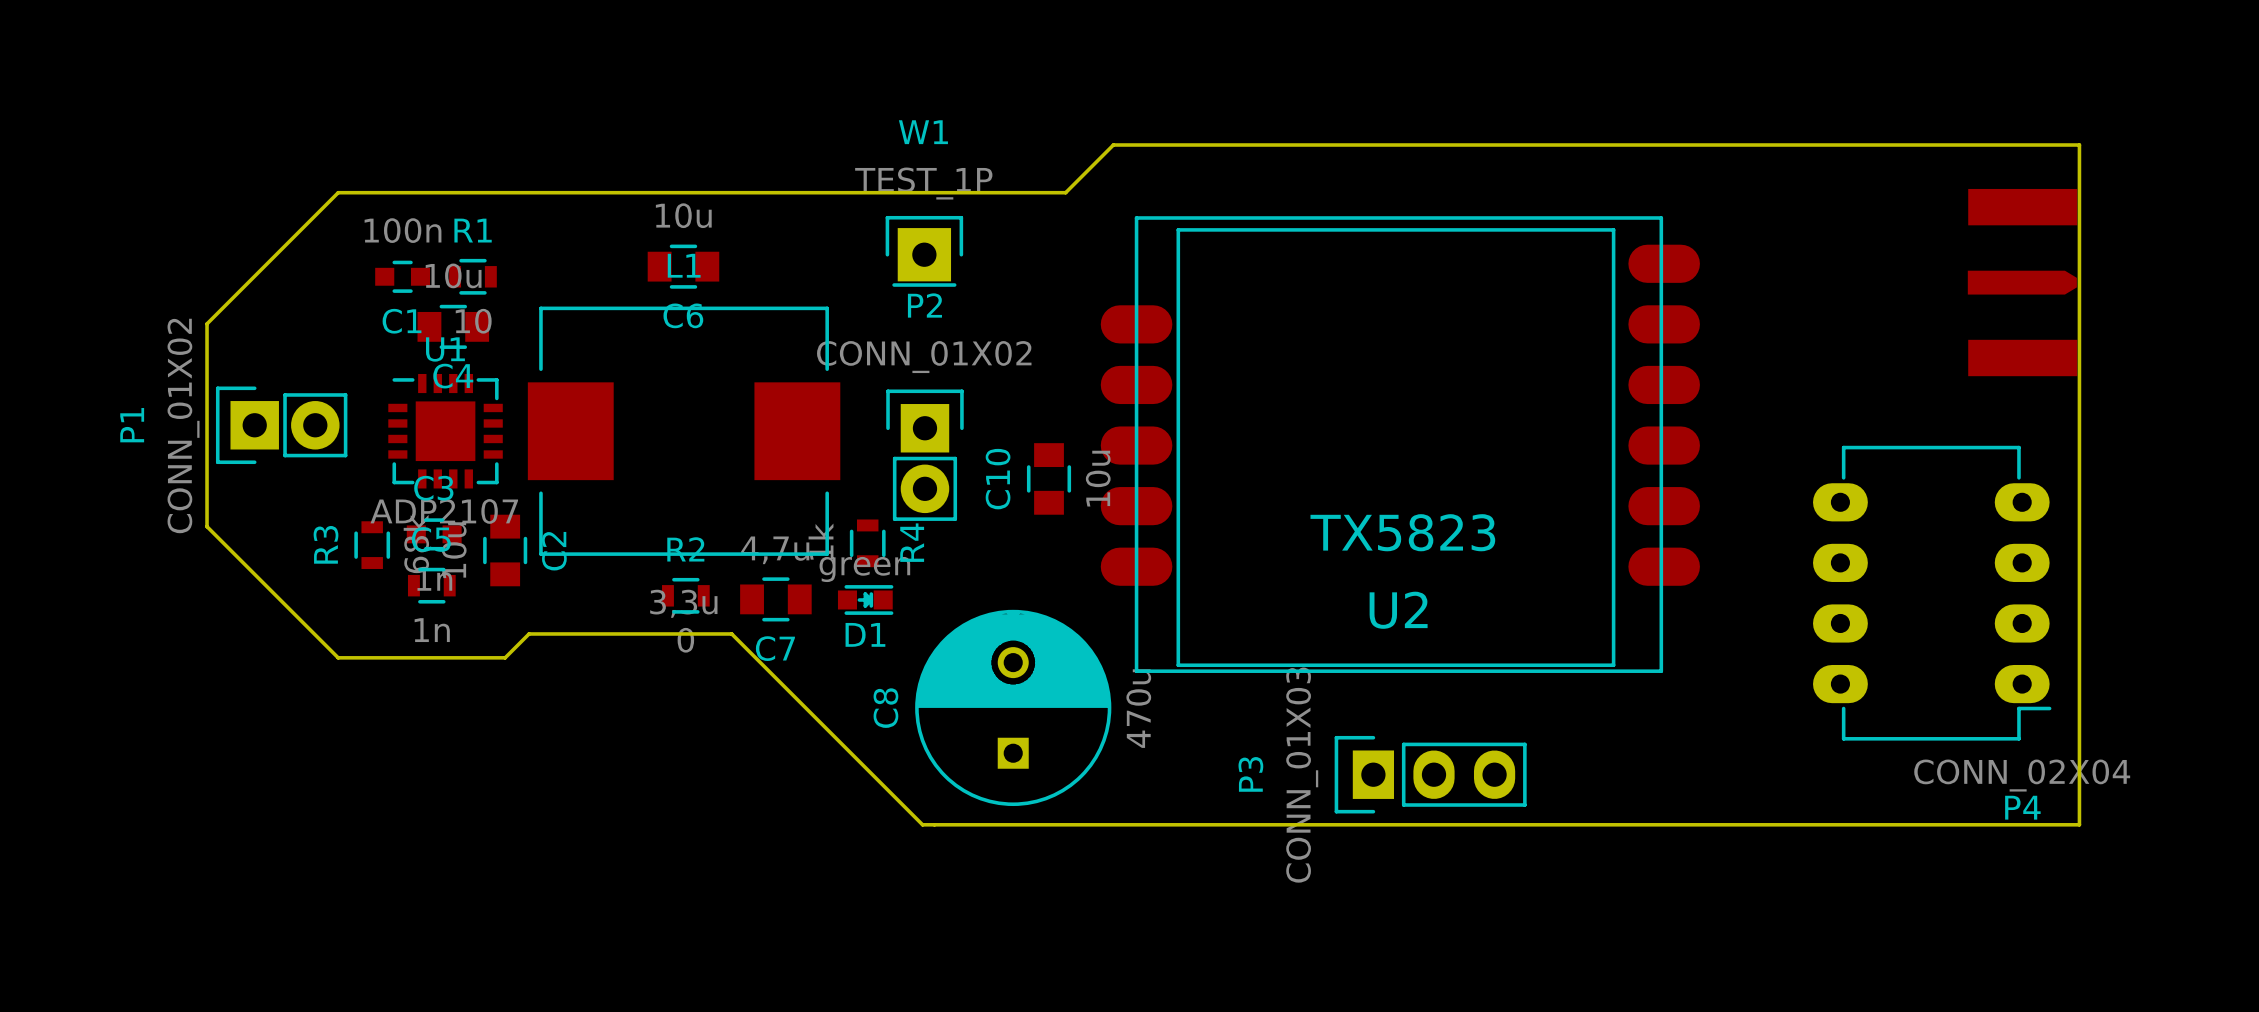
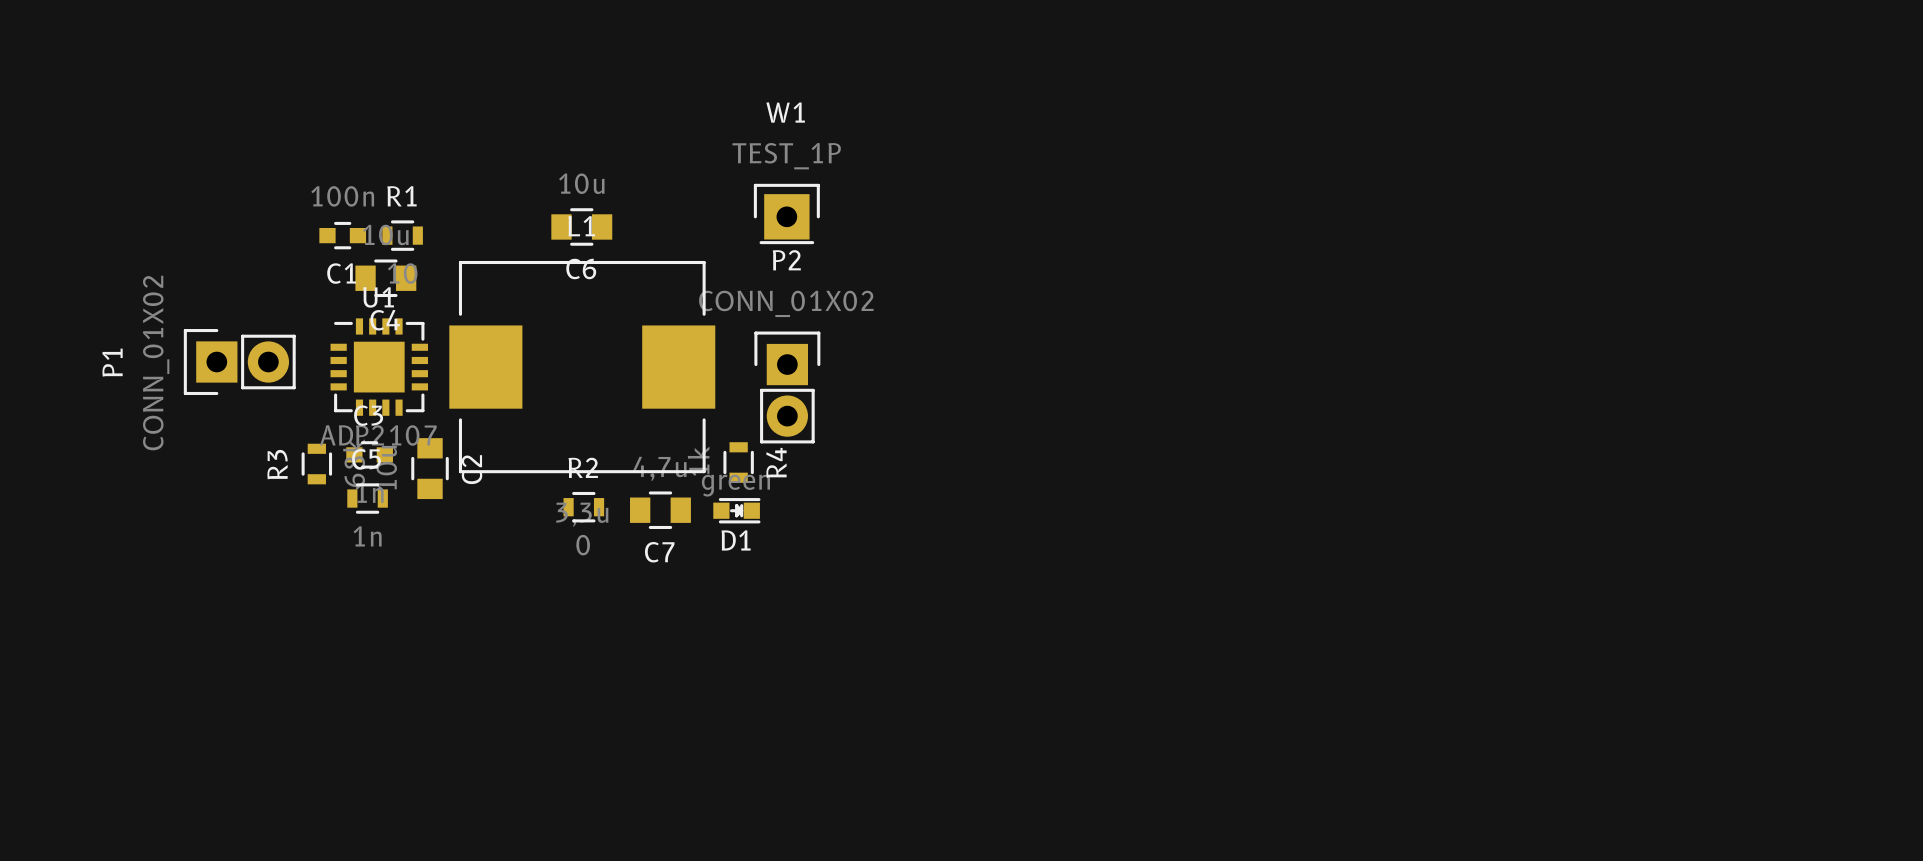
board edge: (1113, 145) (2079, 145) (2079, 824) (922, 824) (731, 633) (529, 633) (505, 657) (338, 657) (207, 526) (207, 323) (338, 192) (1065, 192) (1113, 145) -> none
part: (2022, 282) -> none
U2: TX5823 (1400, 444) -> none
C10: 10u (1049, 478) -> none
P4: CONN_02X04 (1932, 593) -> none
C8: 470u (1013, 707) -> none
P3: CONN_01X03 (1430, 774) -> none

